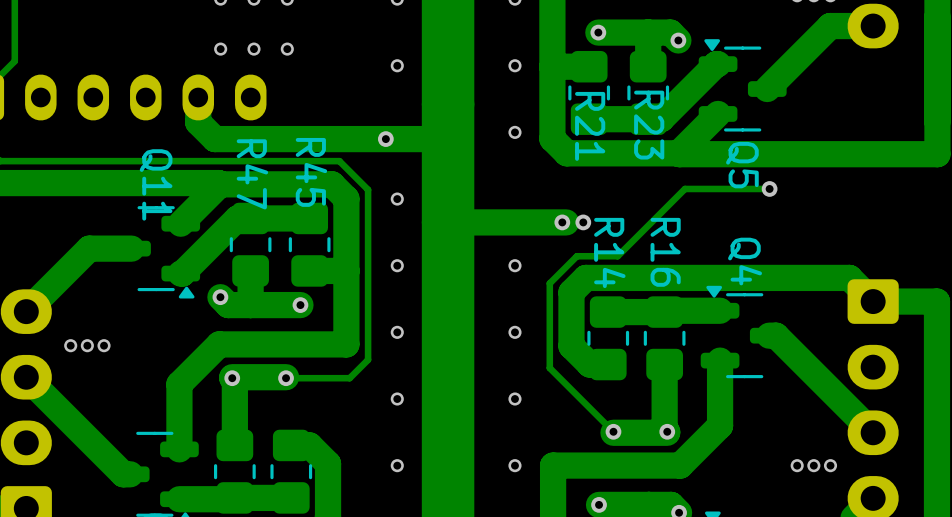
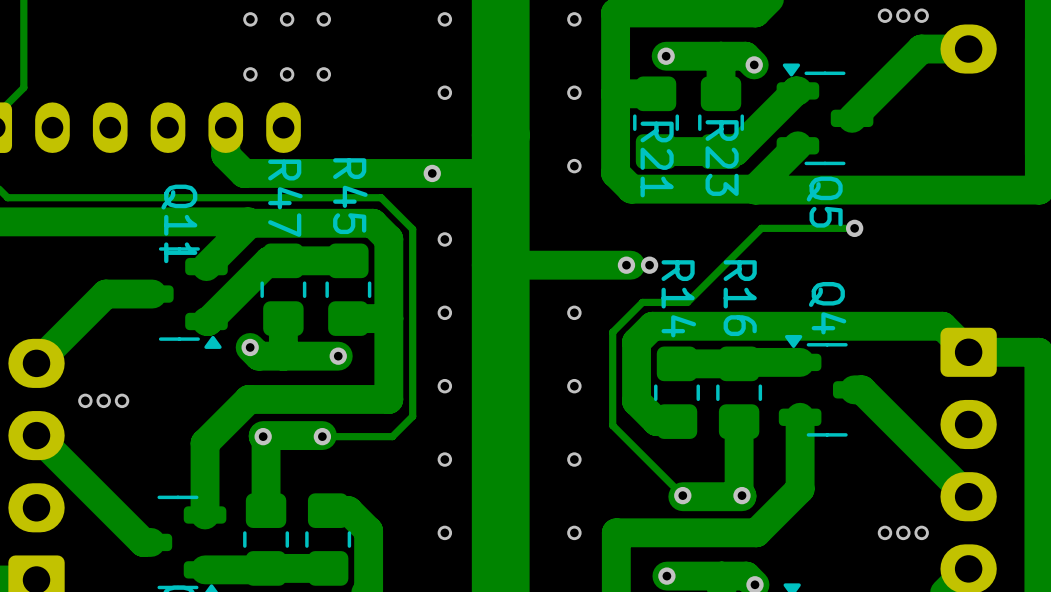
R45 name position: R45 (311, 172) -> R45 (350, 196)
R47 name position: R47 (252, 174) -> R47 (285, 198)

